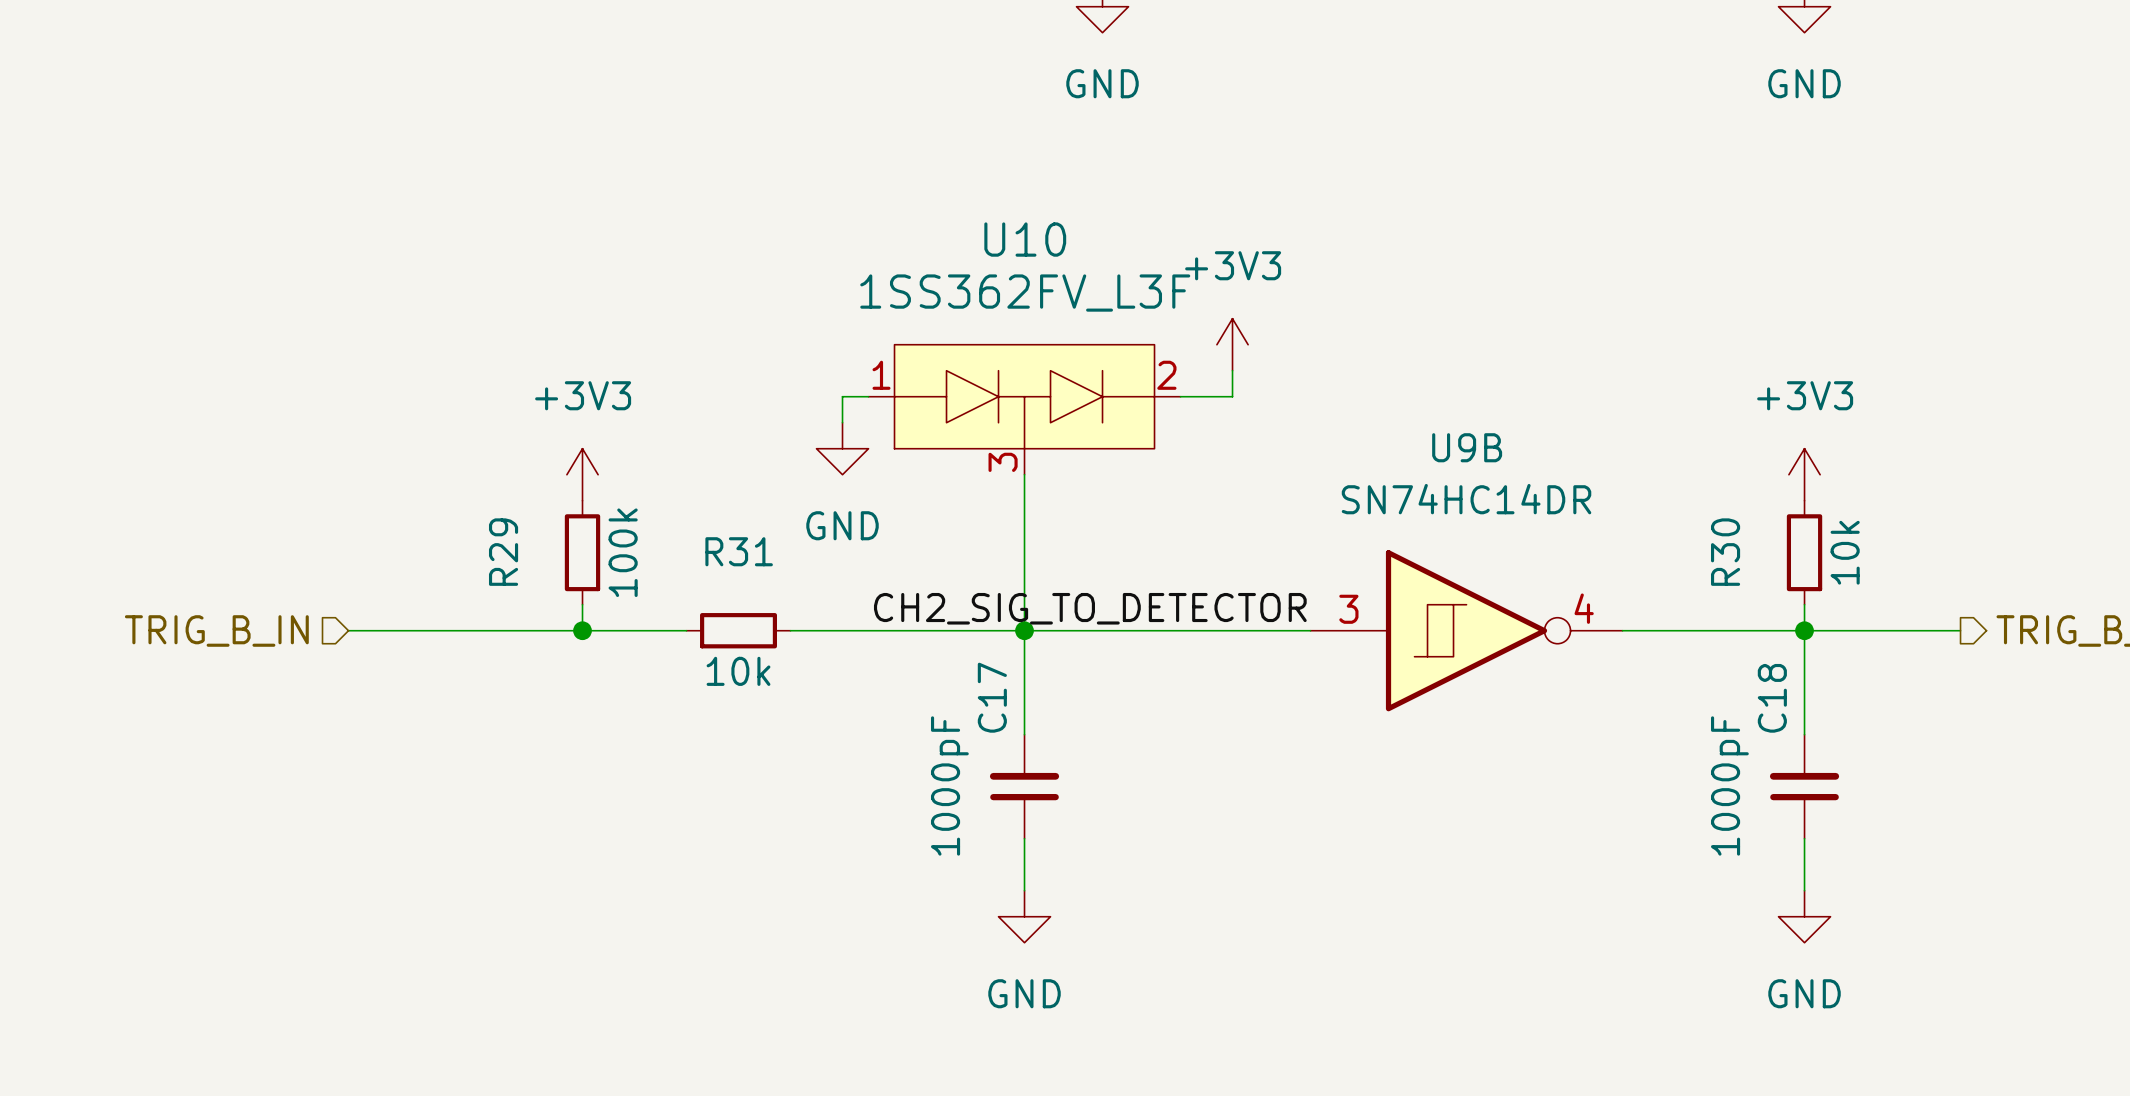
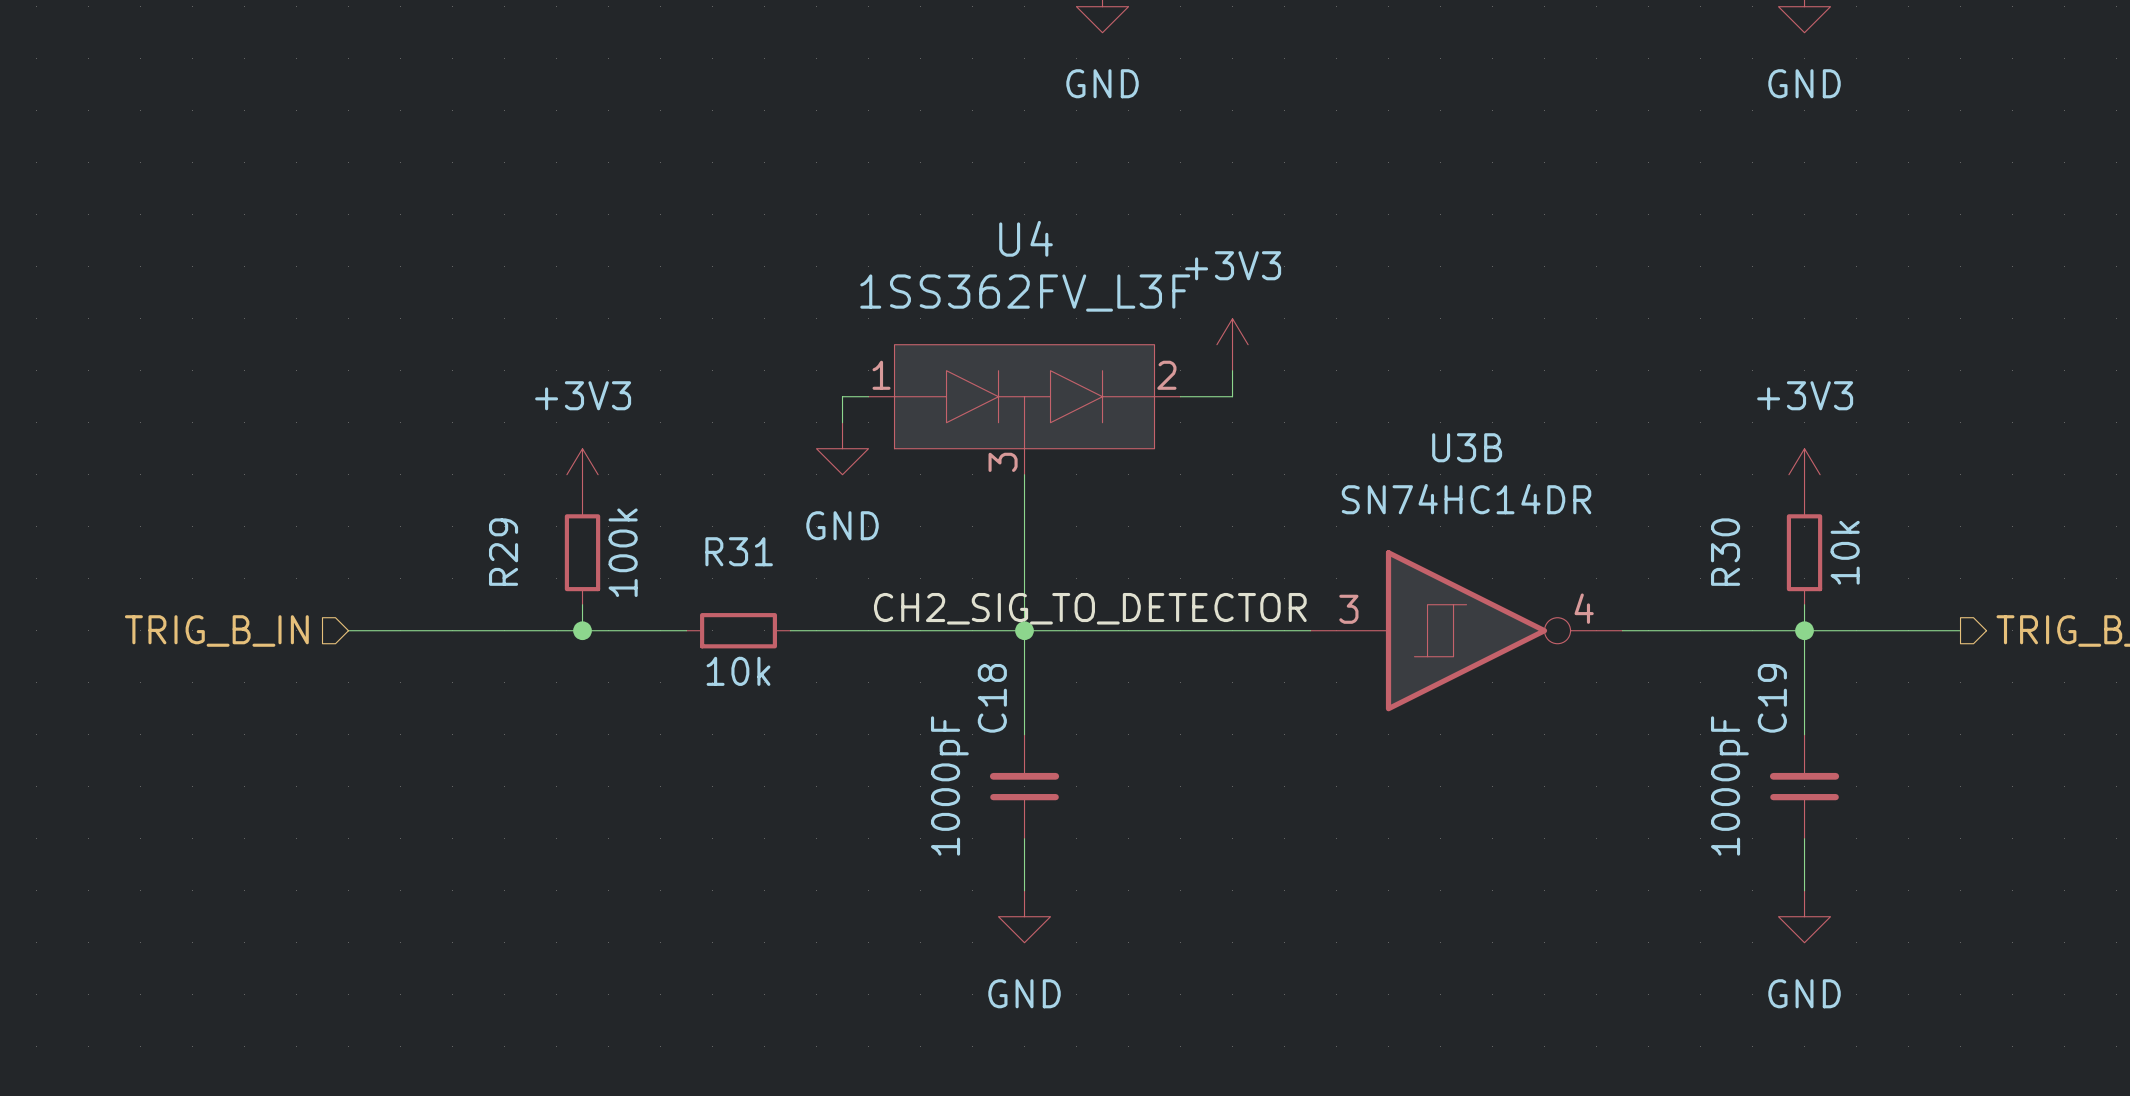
U10 name: U10 (1025, 239) -> U4 (1026, 238)
U9B name: U9B (1467, 447) -> U3B (1467, 447)
C17 name: C17 (992, 697) -> C18 (992, 698)
C18 name: C18 (1772, 698) -> C19 (1772, 698)

